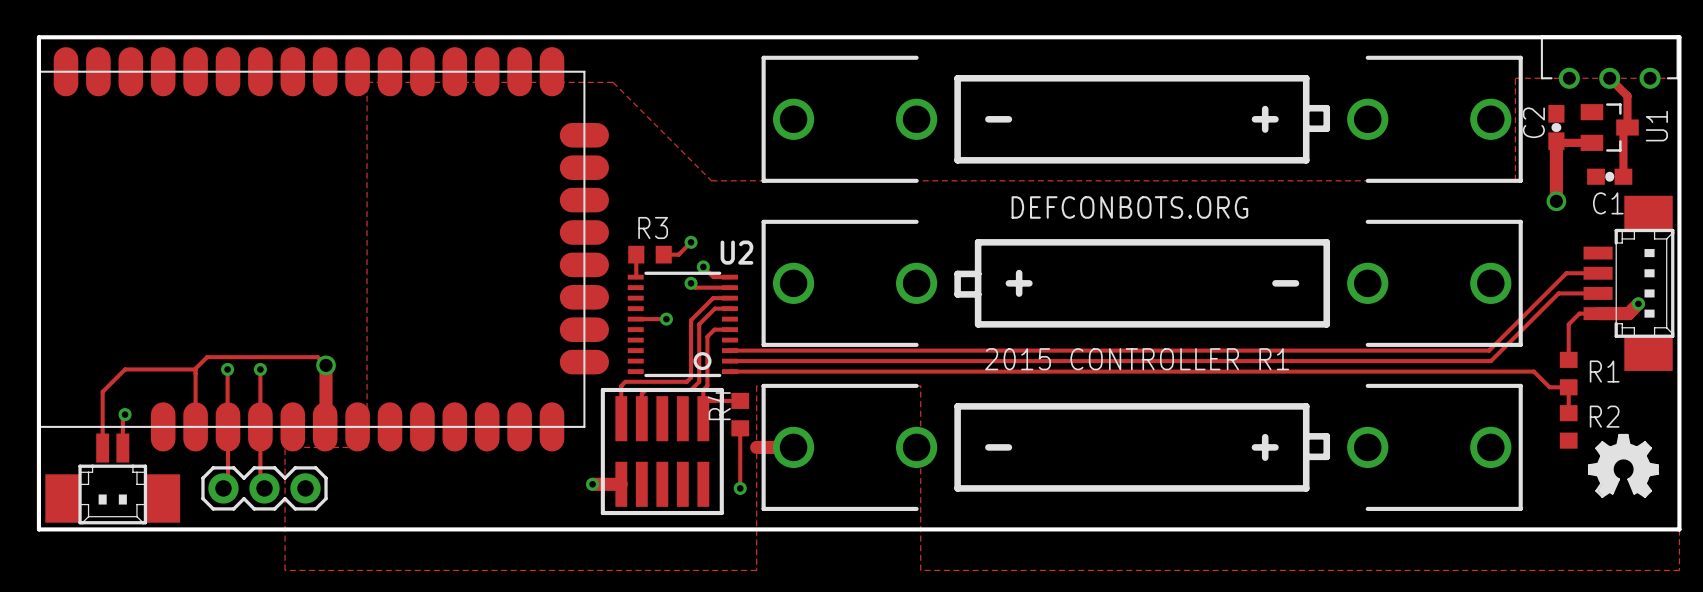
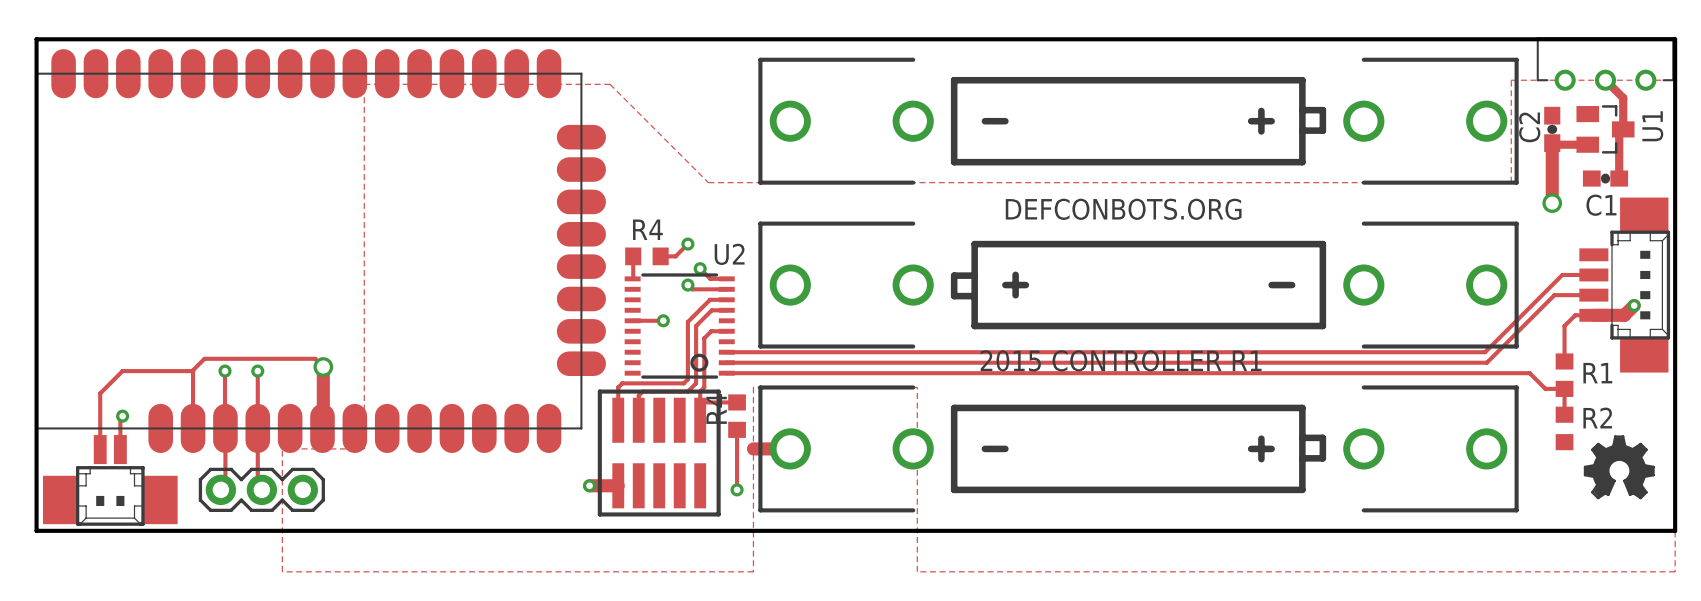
R3 name: R3 (653, 227) -> R4 (647, 229)

